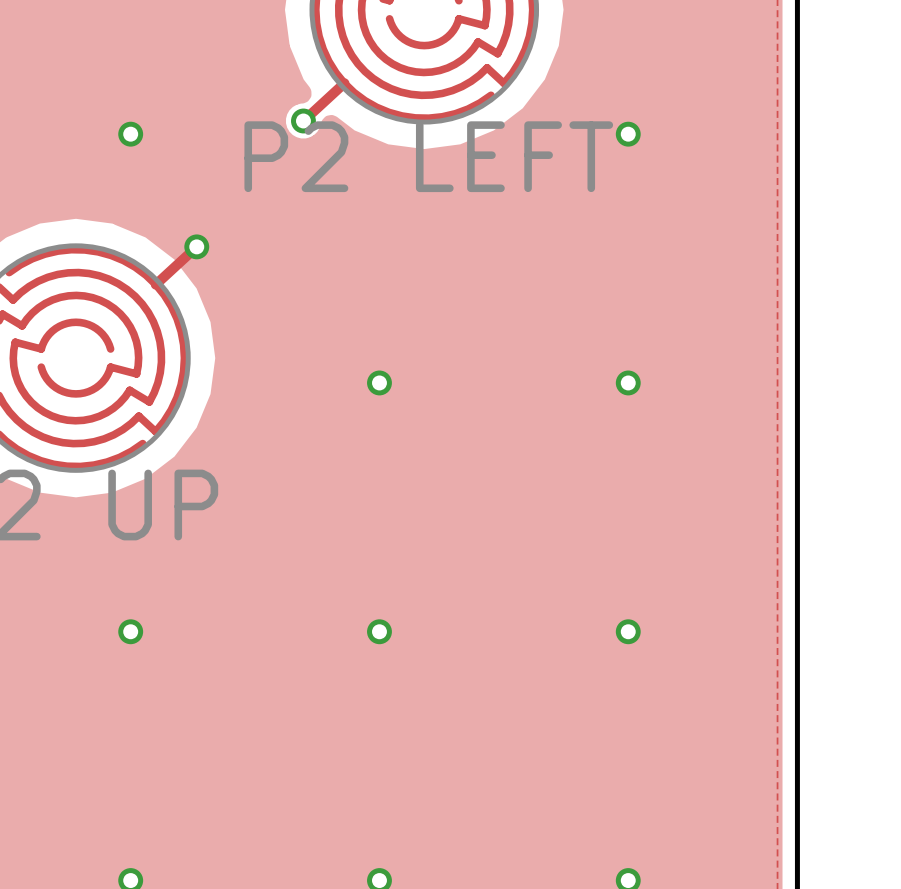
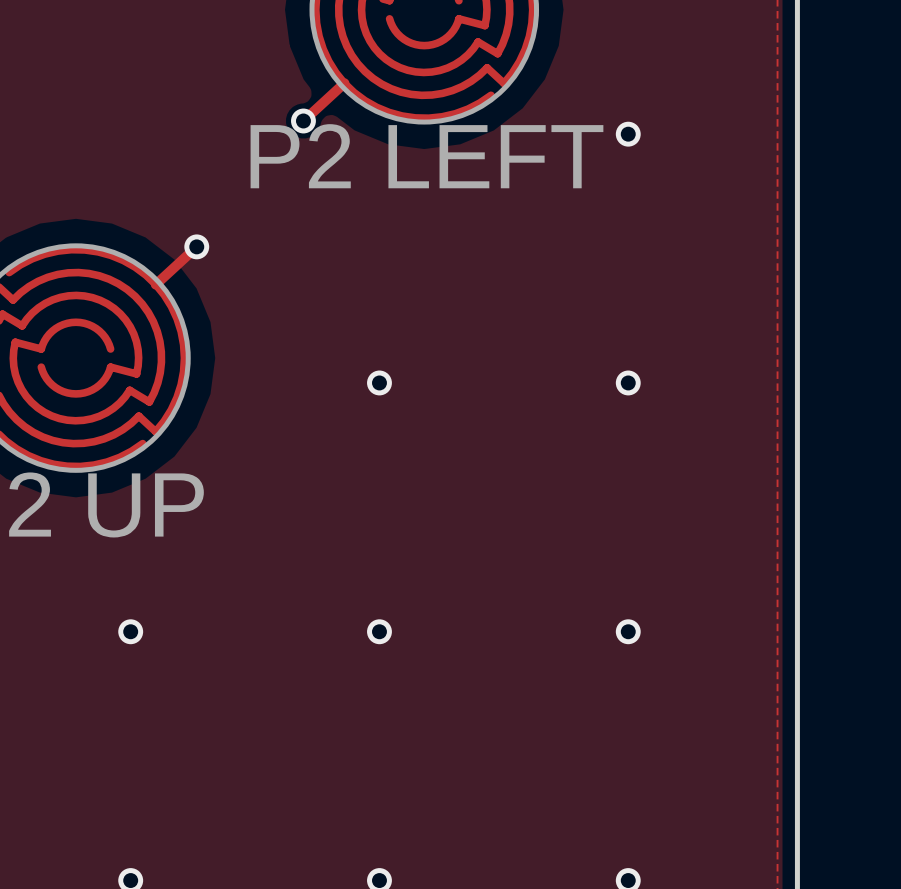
via: (130, 134) -> none

